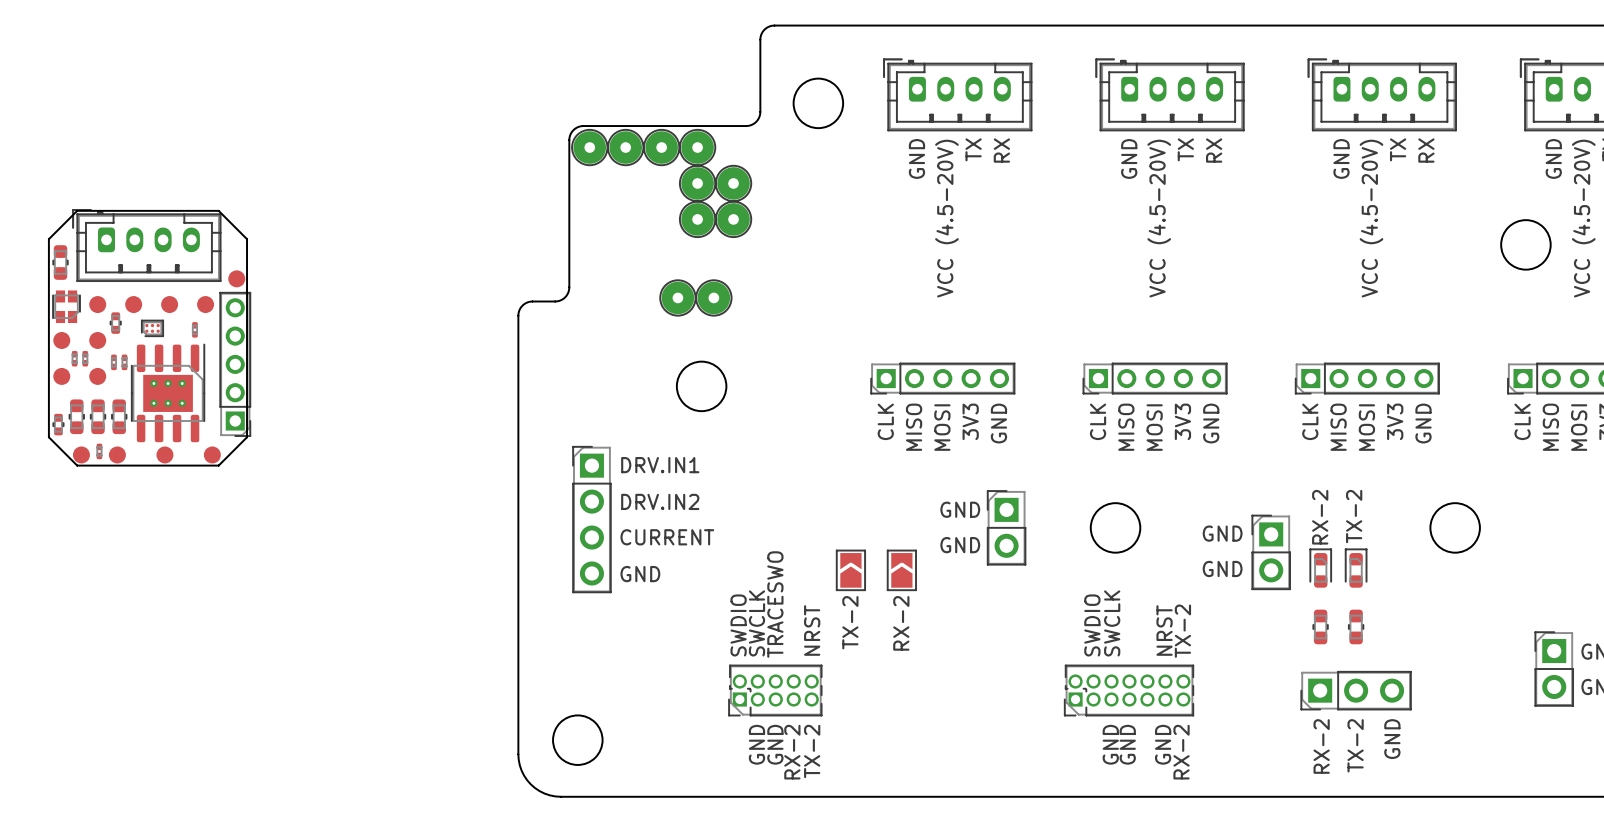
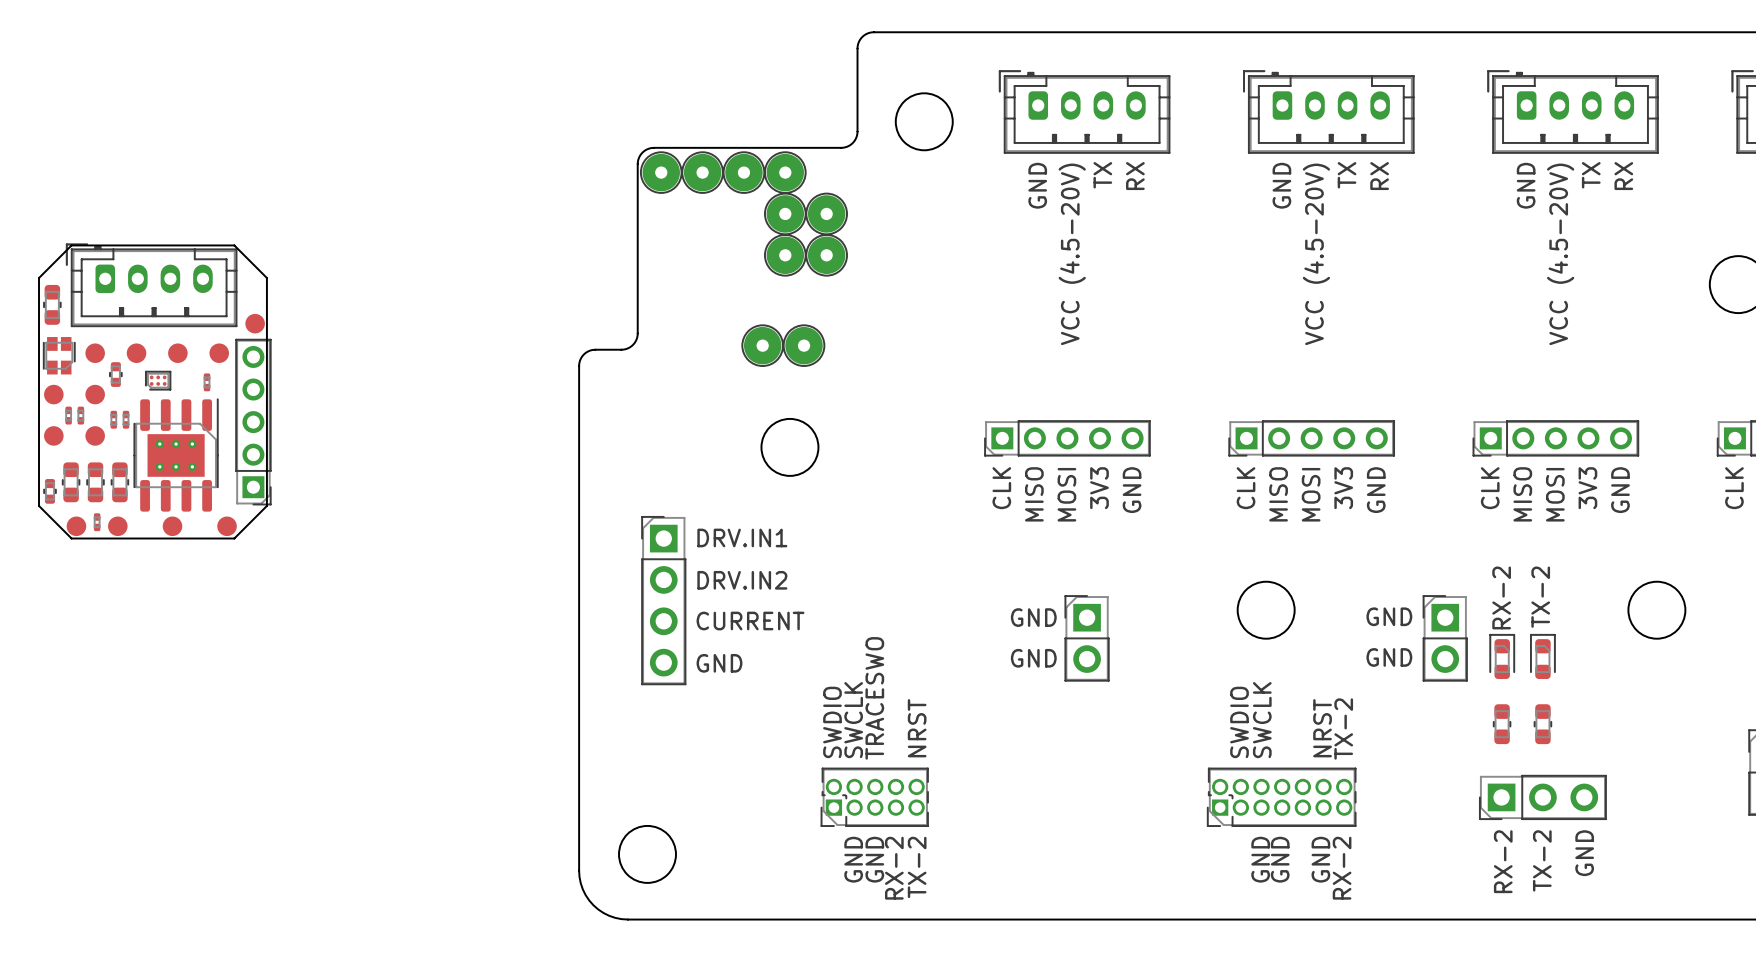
text: GND (960, 509) -> none
part position: (1006, 527) -> (1087, 638)
text: none -> GND (1033, 617)
text: GND (960, 545) -> none
text: none -> GND (1033, 658)
part: (850, 570) -> none
part: (901, 570) -> none
text: TX-2 (850, 622) -> none
text: RX-2 (901, 623) -> none

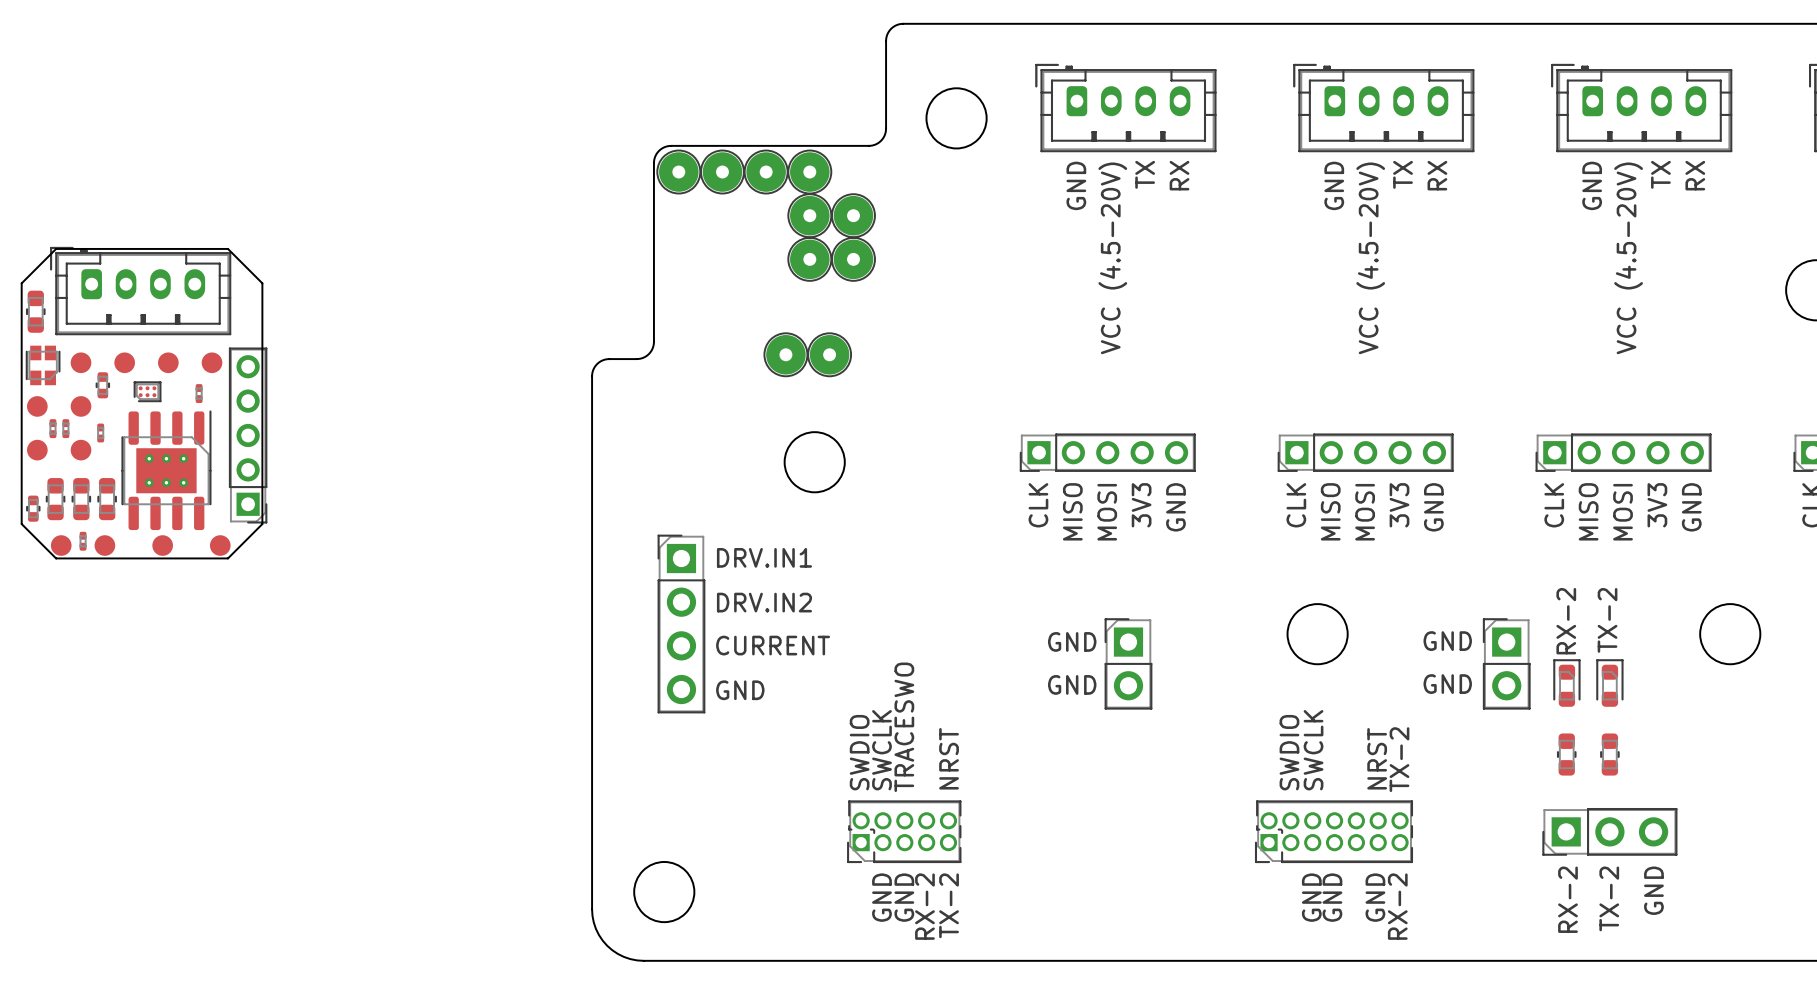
part: (255, 323) -> none
part: (126, 419) -> none

